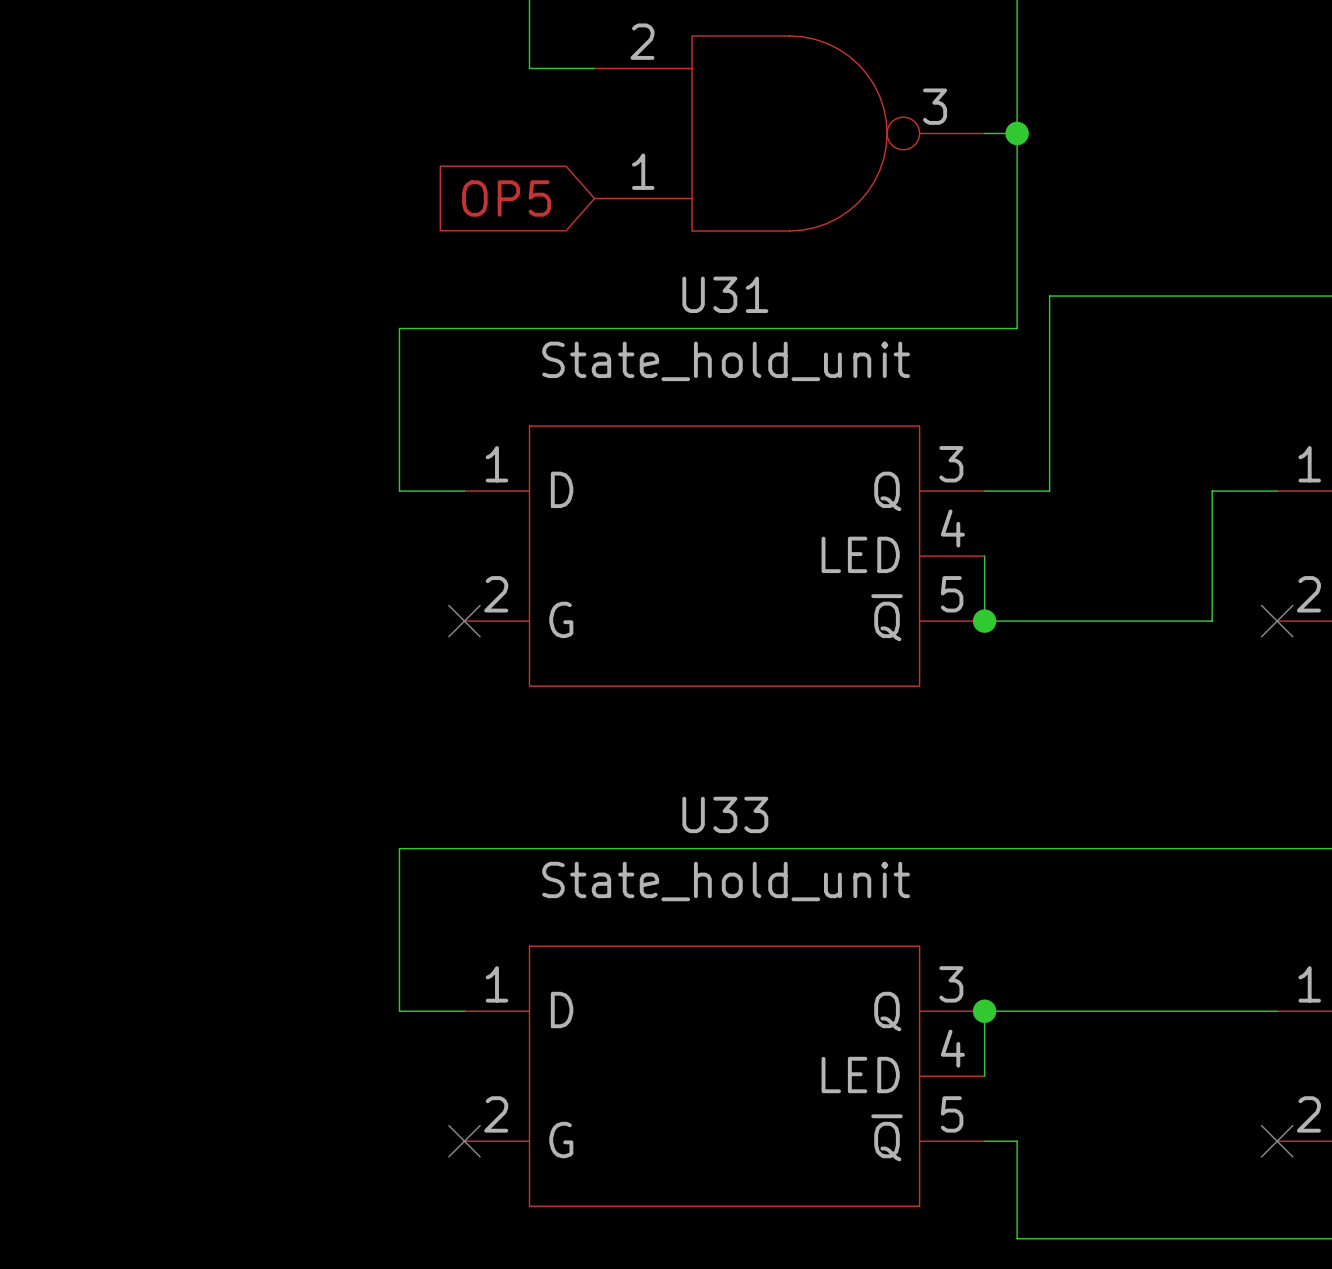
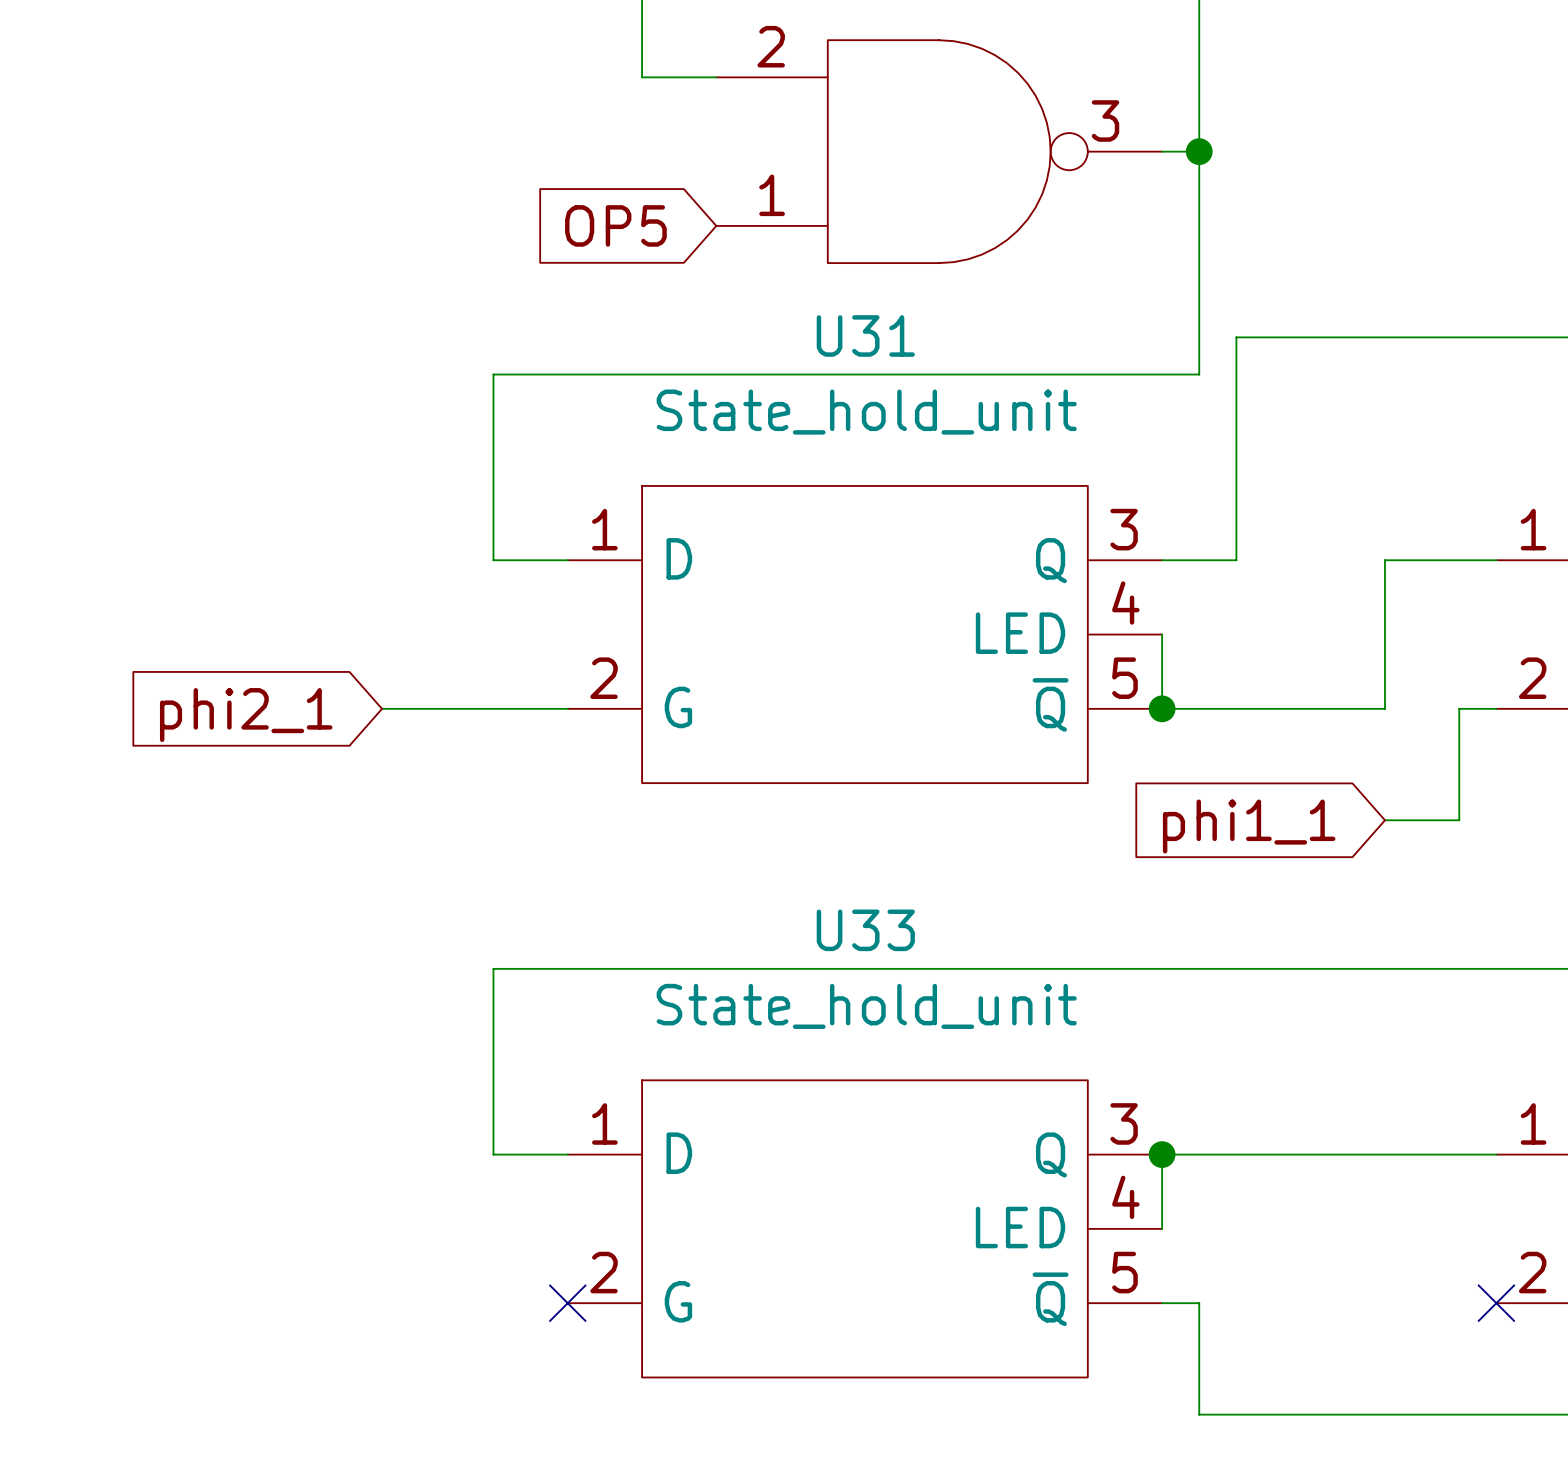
wire: (1212, 491) (1212, 621) (1179, 621) -> (1422, 560) (1384, 560) (1384, 708)
wire: none -> (382, 708) (567, 708)
no-connect mark: (464, 621) -> none
wire: none -> (1496, 708) (1459, 708) (1459, 820) (1384, 820)
no-connect mark: (1277, 621) -> none
global label: none -> phi2_1 (246, 715)
global label: none -> phi1_1 (1249, 826)

